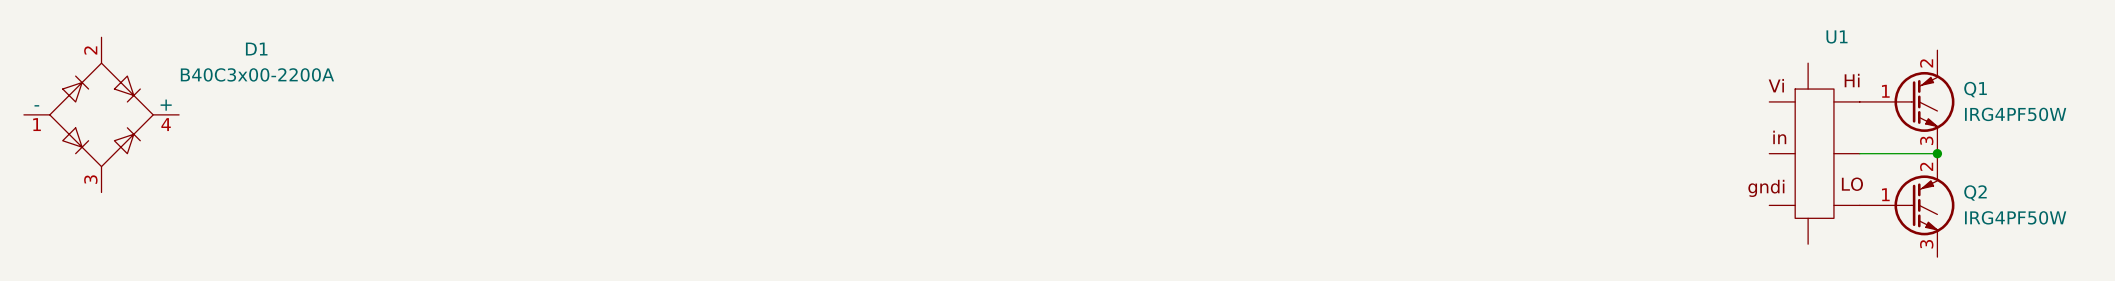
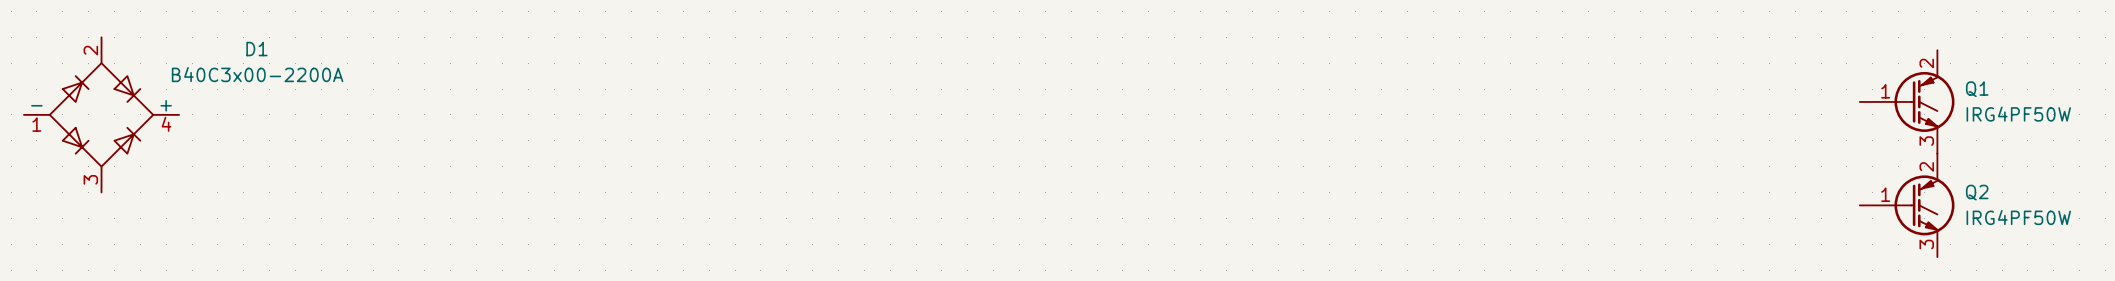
U1: (1814, 153) -> none
wire: (1859, 153) (1937, 153) -> none
junction: (1937, 153) -> none

